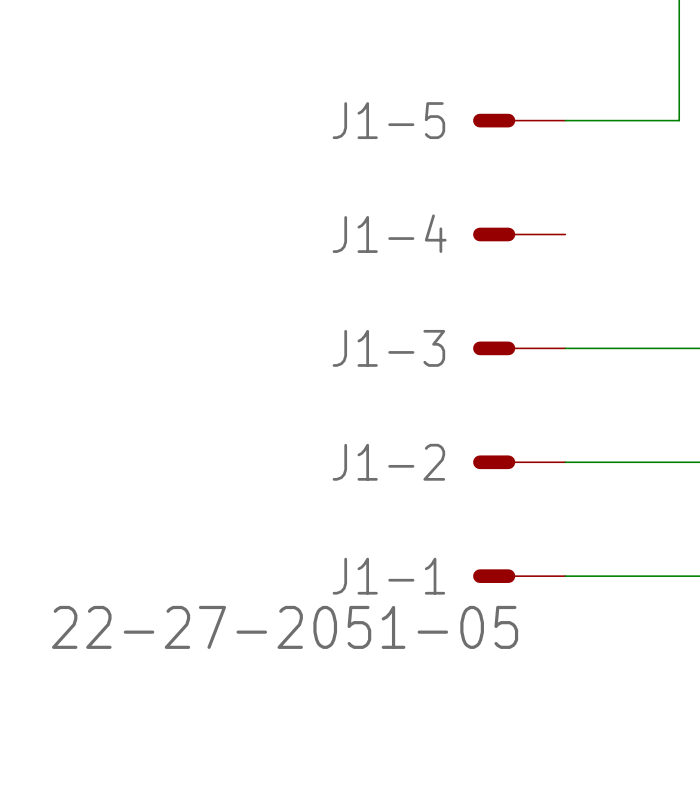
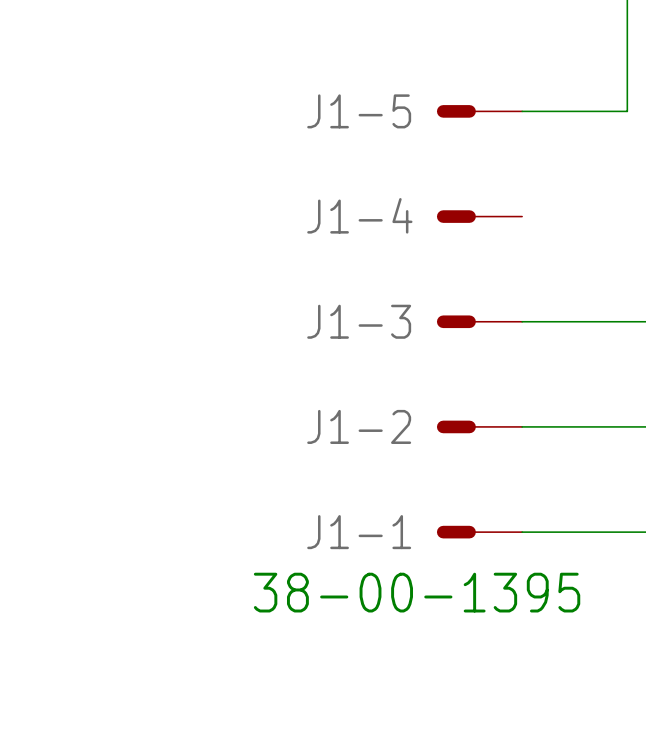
J1-1 value: 22-27-2051-05 (285, 627) -> none
text: none -> 38-00-1395 (417, 592)

